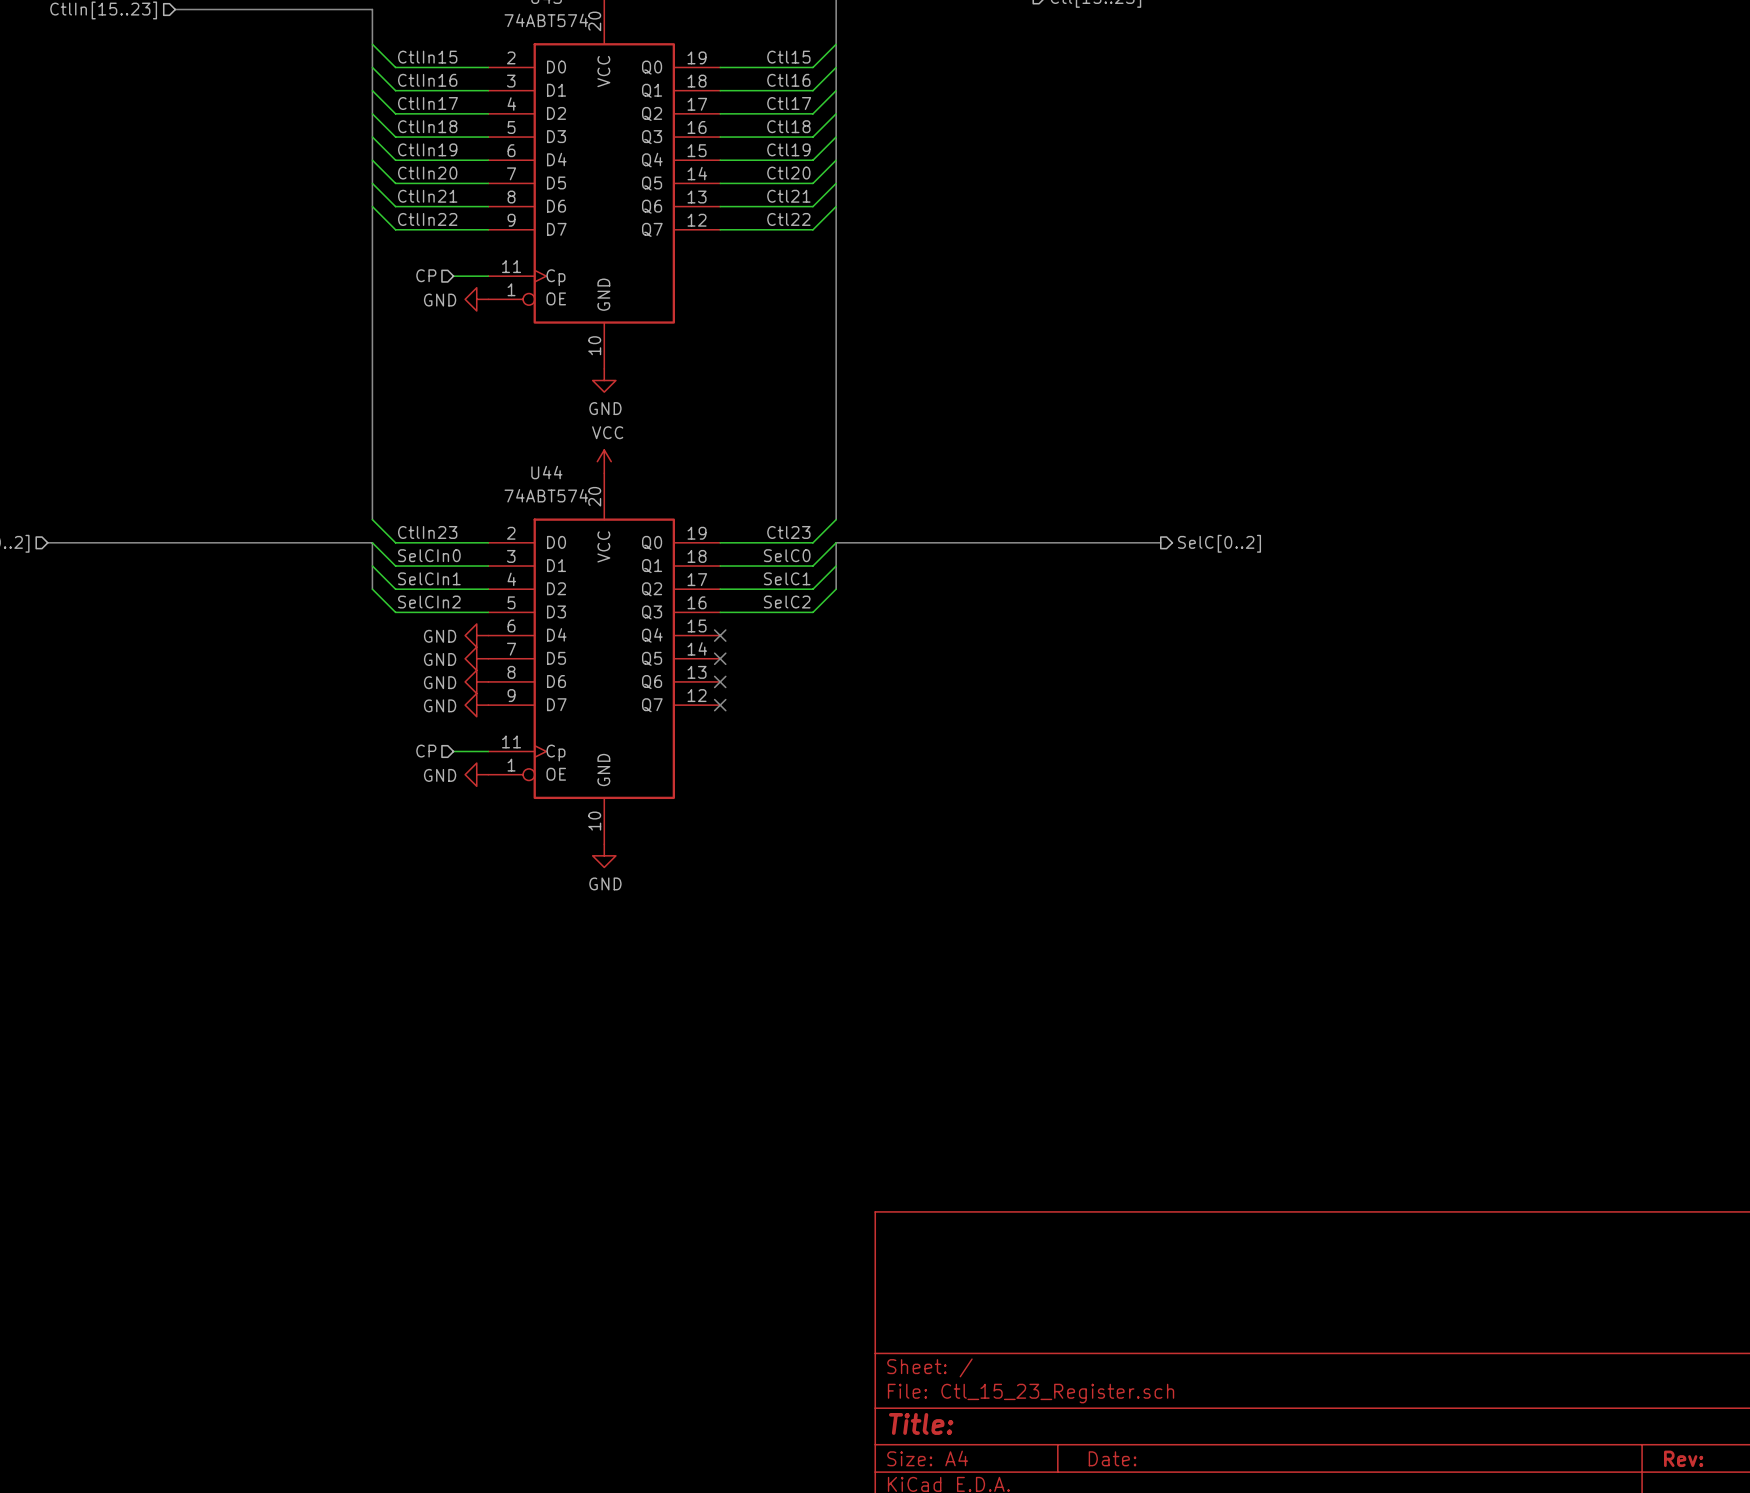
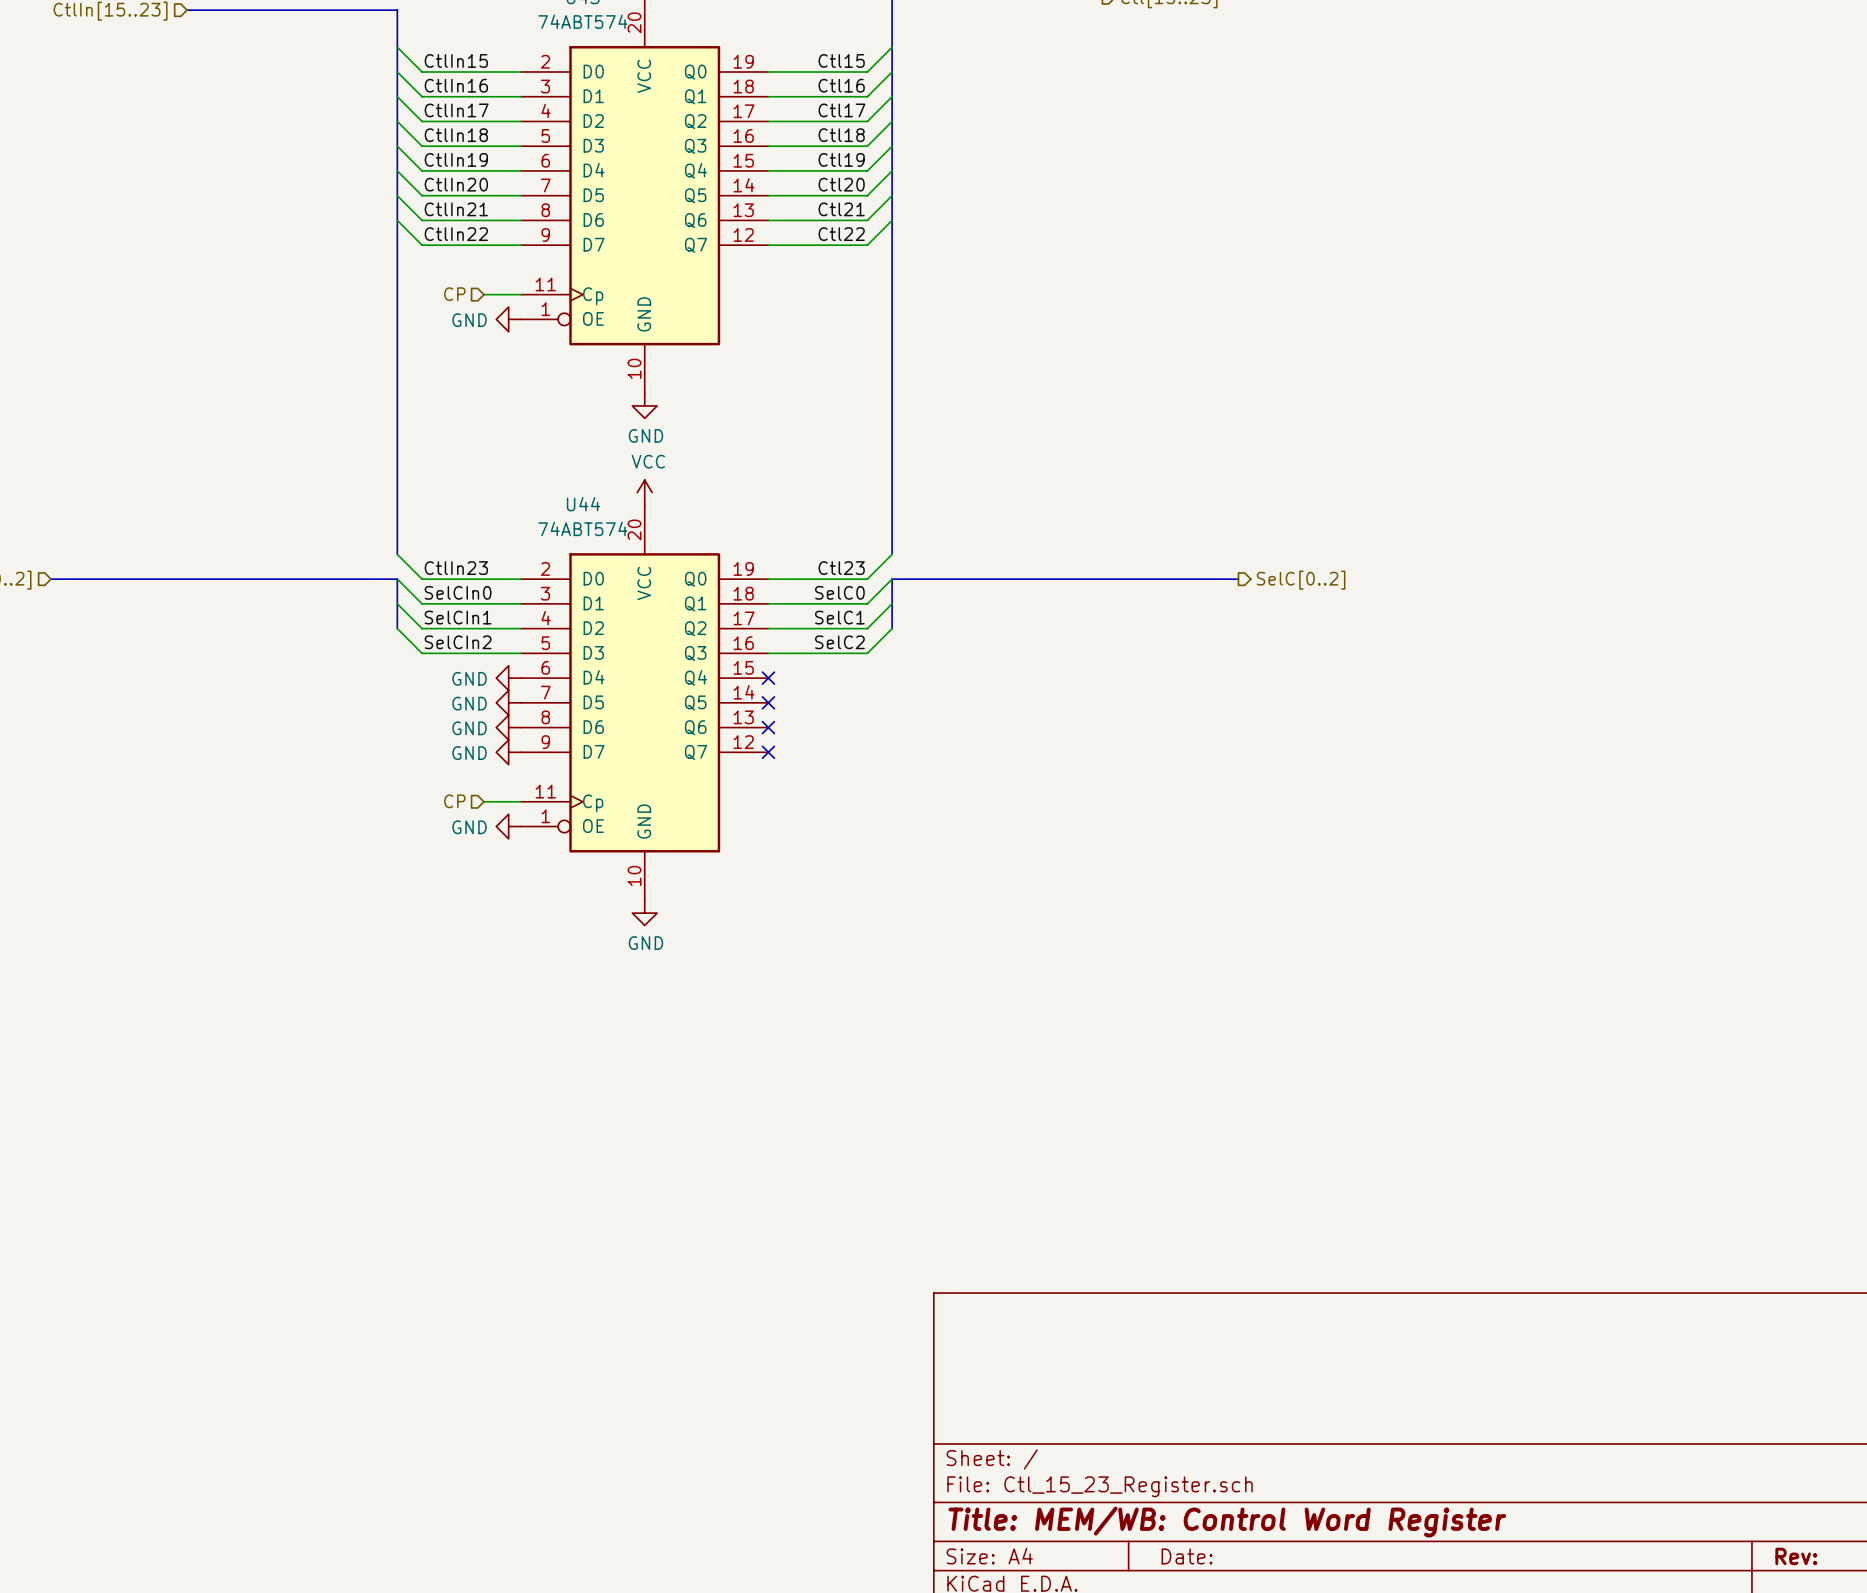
title block: Title: (921, 1423) -> Title: MEM/WB: Control Word Register (1227, 1522)

